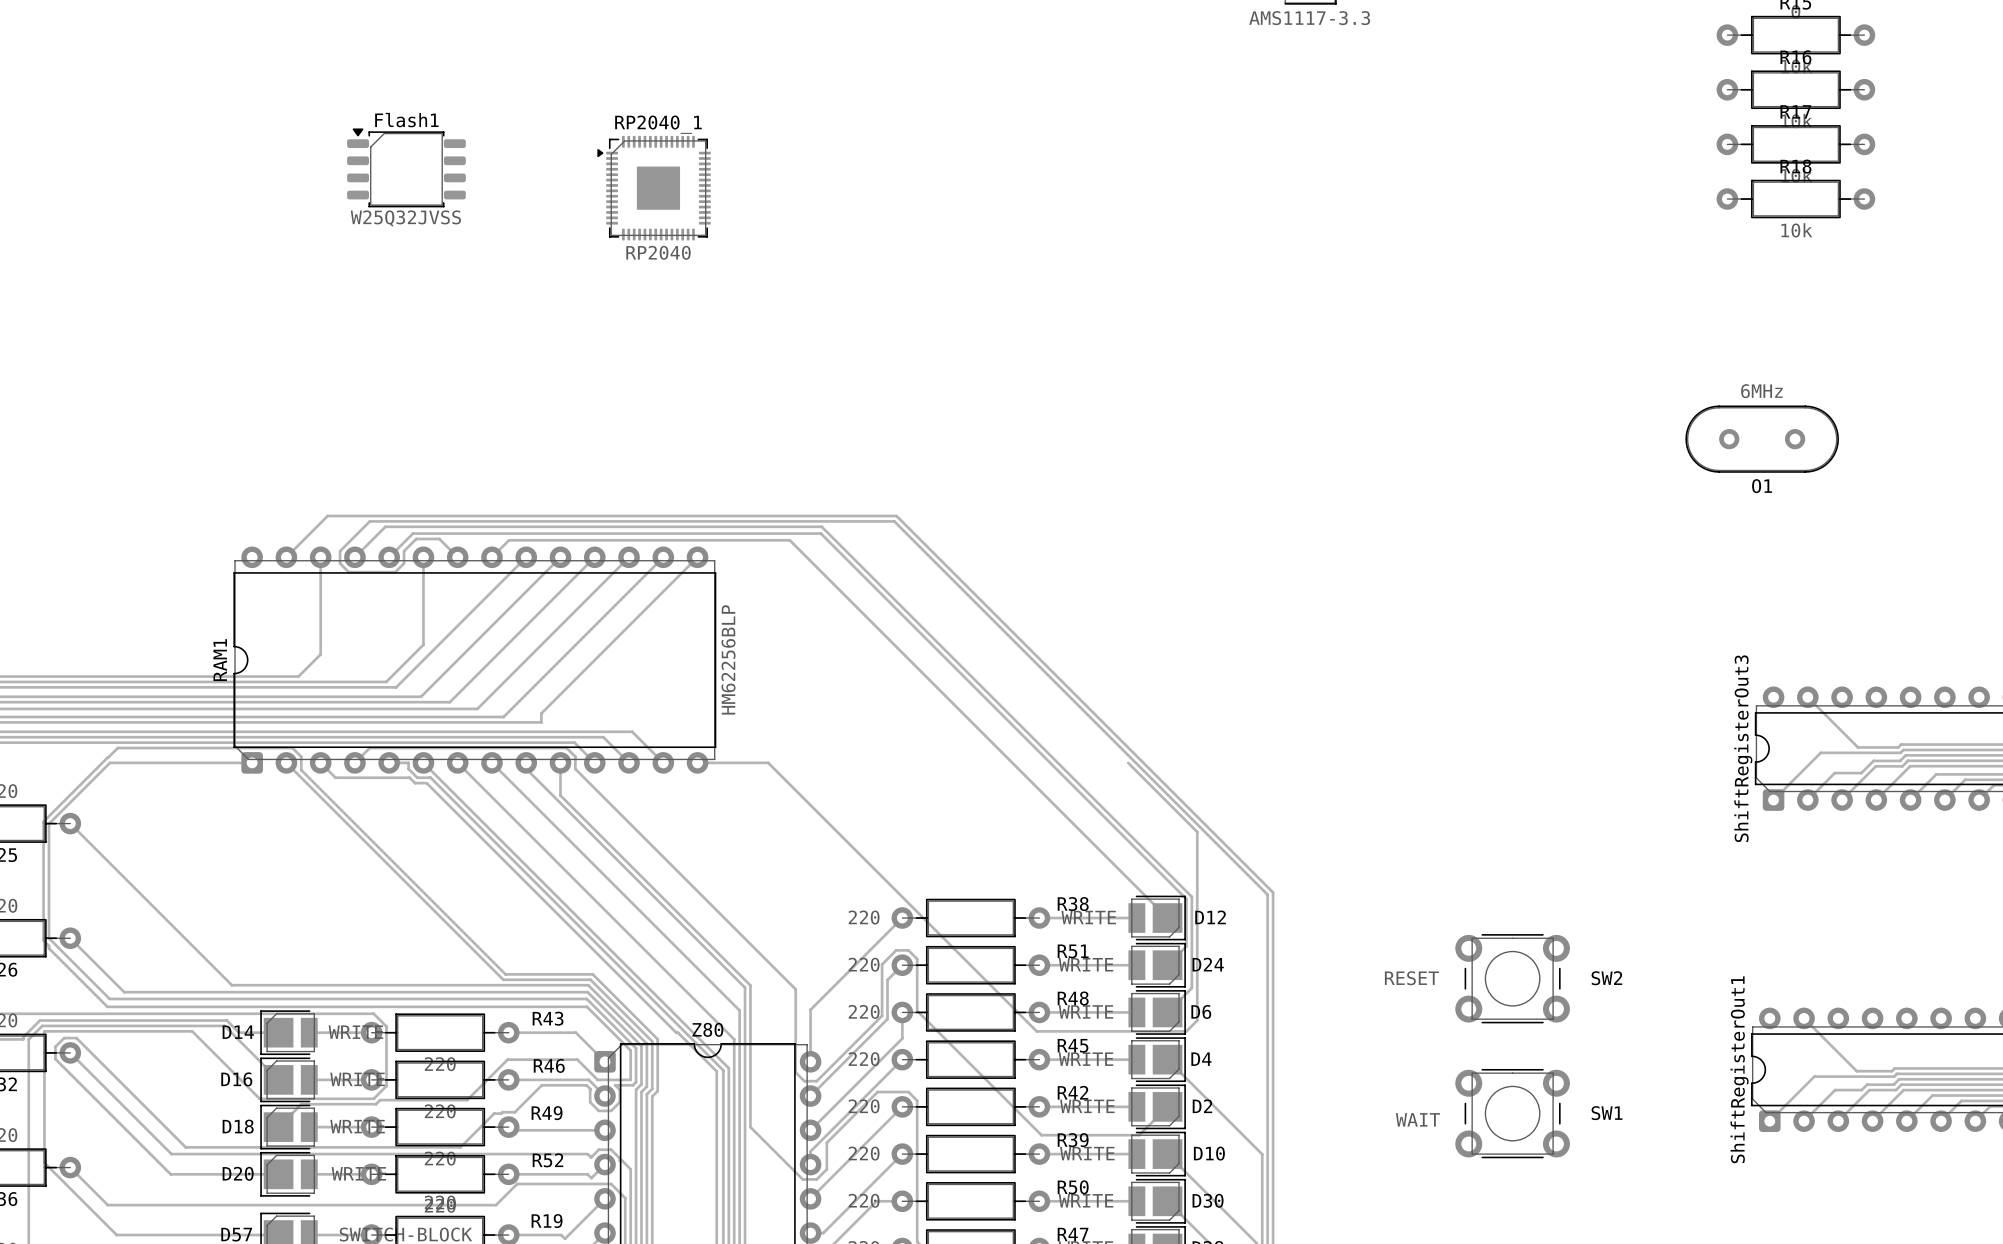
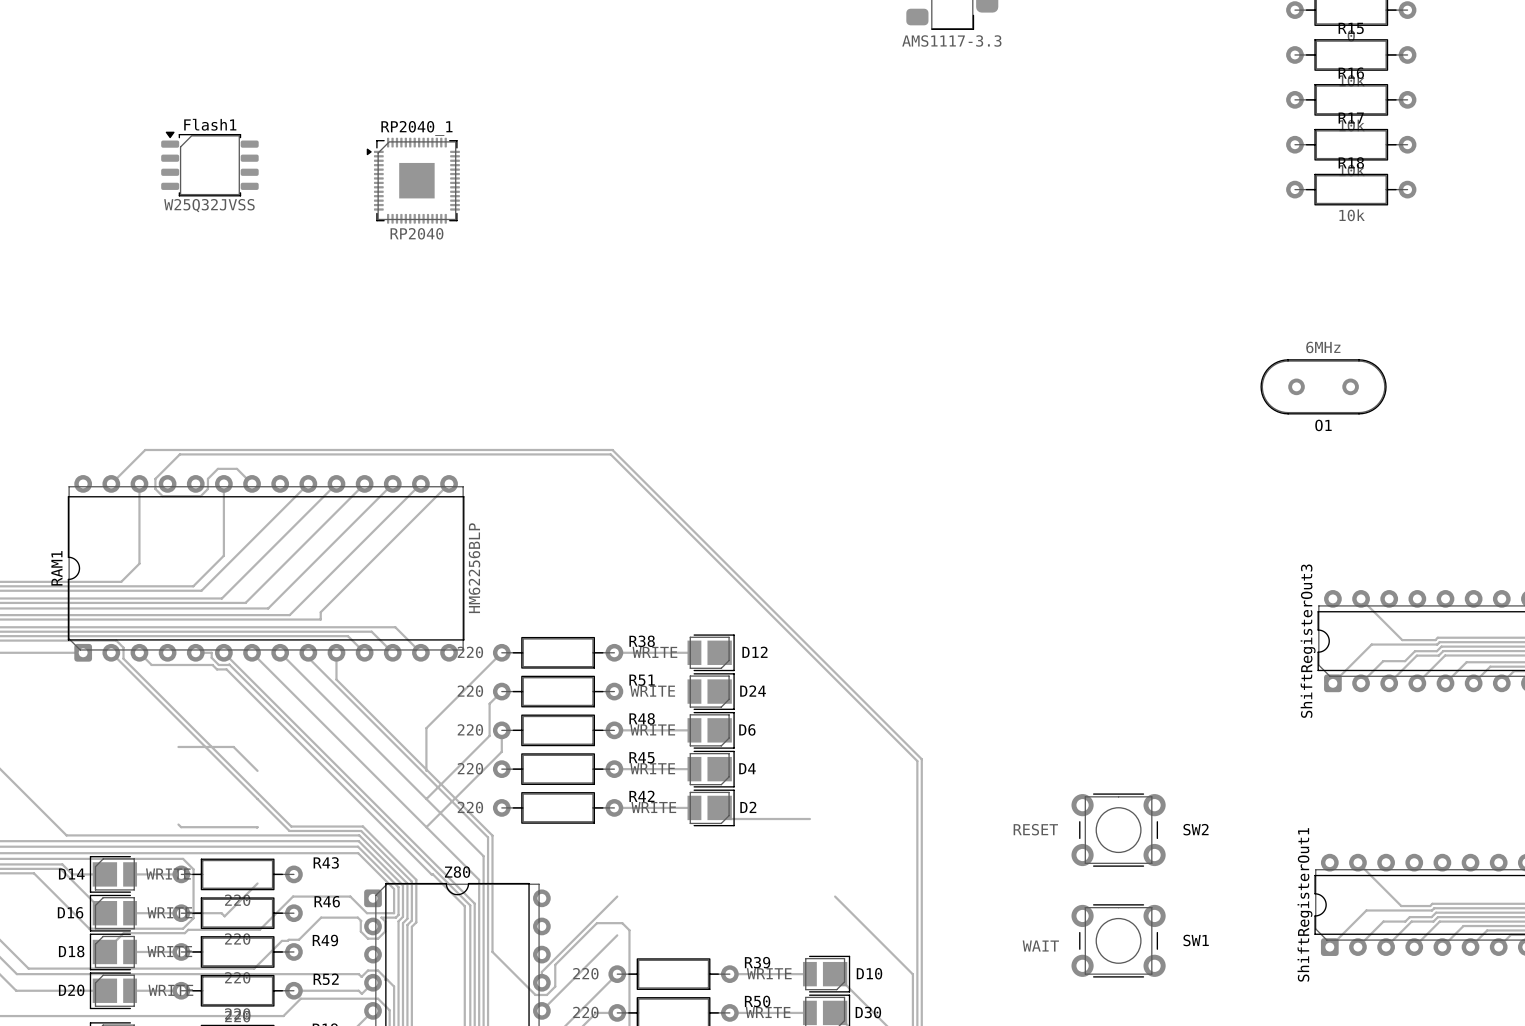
track: (354, 557) (385, 526) (821, 526) (1191, 896) (1191, 988) (1167, 1012) -> none
track: (389, 557) (412, 533) (820, 533) (1186, 899) (1186, 946) (1167, 965) -> none
track: (491, 557) (508, 540) (789, 540) (1167, 918) -> none
track: (354, 762) (369, 748) (566, 748) (575, 756) (575, 769) (795, 989) (795, 1072) (804, 1081) (816, 1081) (882, 1015) (882, 964) (896, 950) (908, 950) (917, 959) (917, 1010) (1041, 1135) (1139, 1135) (1167, 1106) -> none
track: (697, 762) (768, 762) (1036, 1031) (1186, 1031) (1197, 1020) (1197, 831) (1128, 762) -> none
track: (902, 918) (810, 1009) (810, 1061) -> (501, 652) (426, 728) (426, 770)
R38 position: (970, 918) -> (558, 652)
track: (1039, 918) (1136, 918) -> (614, 652) (694, 652)
D12 position: (1157, 918) -> (711, 652)
track: (902, 965) (887, 980) (887, 1019) (810, 1096) -> (501, 691) (489, 703) (489, 735) (426, 799)
R51 position: (970, 965) -> (558, 691)
D24 position: (1157, 965) -> (711, 691)
track: (902, 1012) (902, 1038) (810, 1130) -> (501, 730) (501, 751) (426, 827)
R48 position: (970, 1012) -> (558, 730)
track: (1039, 1012) (1136, 1012) -> (614, 730) (694, 730)
D6 position: (1157, 1012) -> (711, 730)
track: (508, 1032) (575, 1032) (604, 1061) -> (178, 746) (233, 746) (257, 770)
track: none -> (257, 883) (224, 916) (221, 913) (181, 913)
R45 position: (970, 1059) -> (558, 769)
track: (1039, 1059) (1136, 1059) -> (614, 769) (694, 769)
D4 position: (1157, 1059) -> (711, 769)
track: (508, 1079) (588, 1079) (604, 1096) -> none
R42 position: (970, 1106) -> (558, 807)
track: (1039, 1106) (1136, 1106) -> (614, 807) (694, 807)
D2 position: (1157, 1106) -> (711, 807)
track: (508, 1127) (511, 1130) (604, 1130) -> (178, 824) (181, 827) (257, 827)

